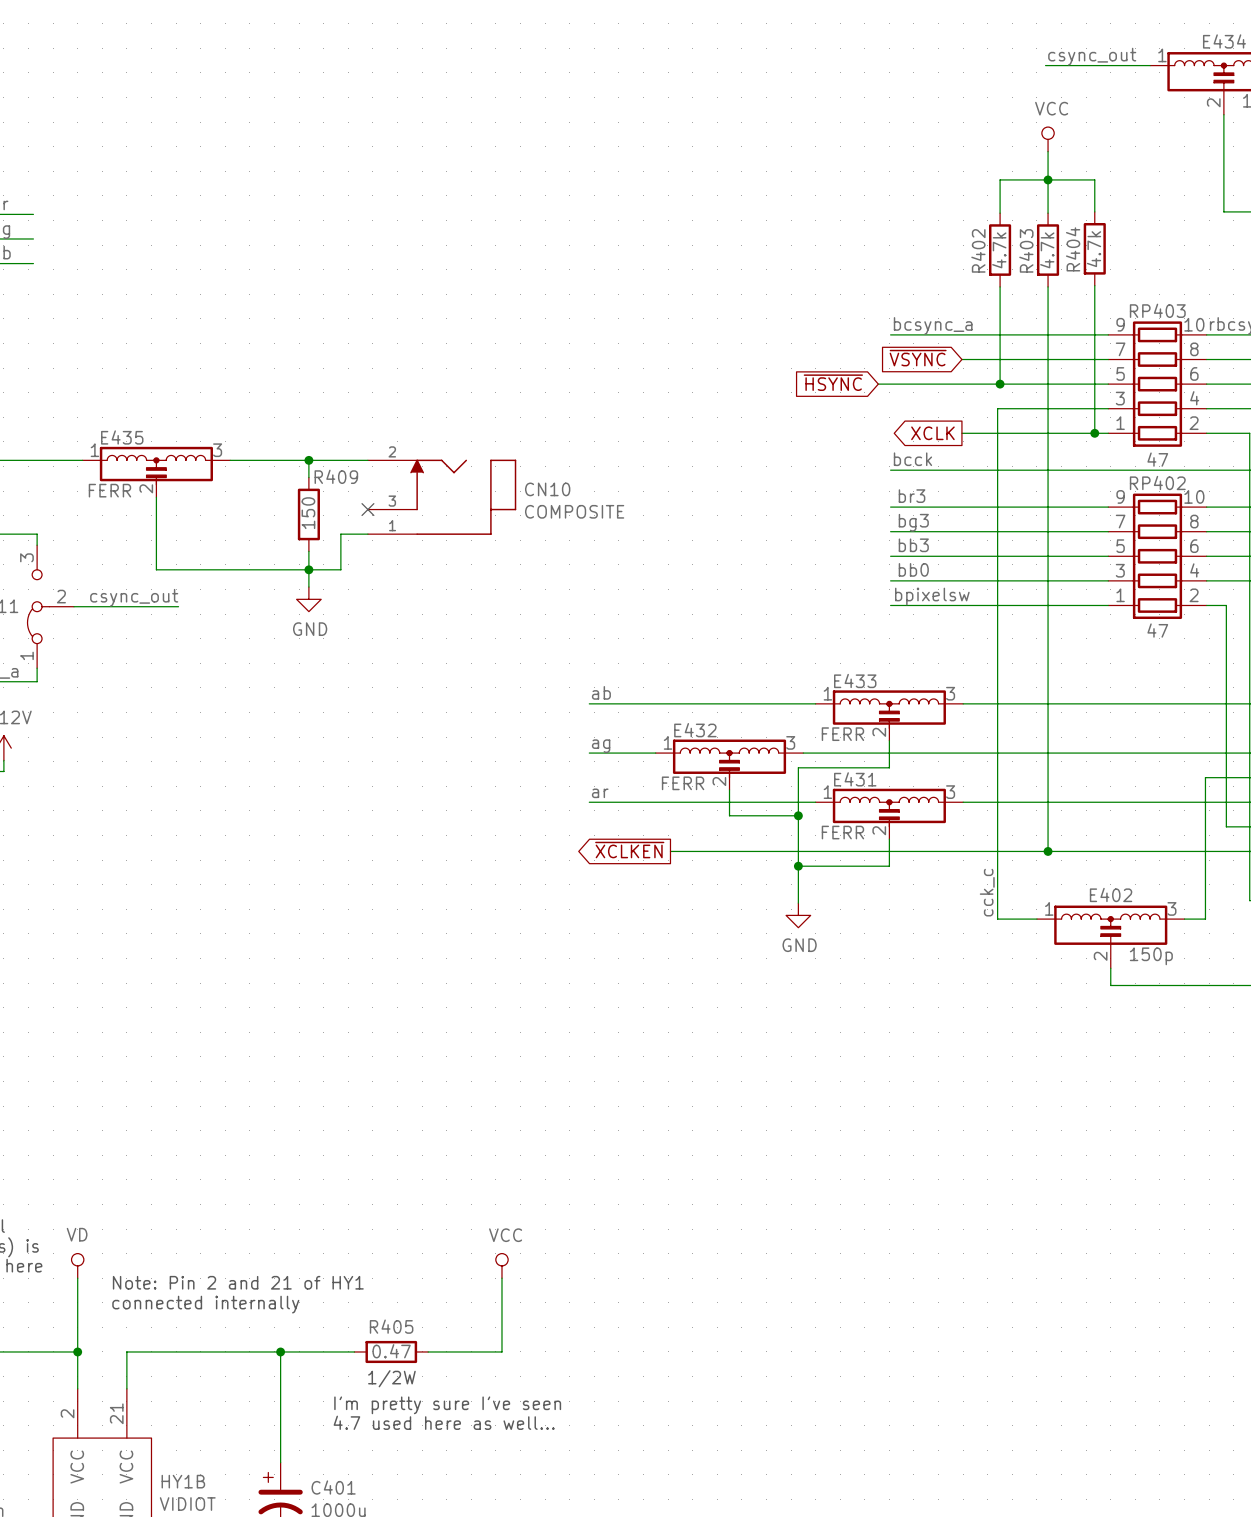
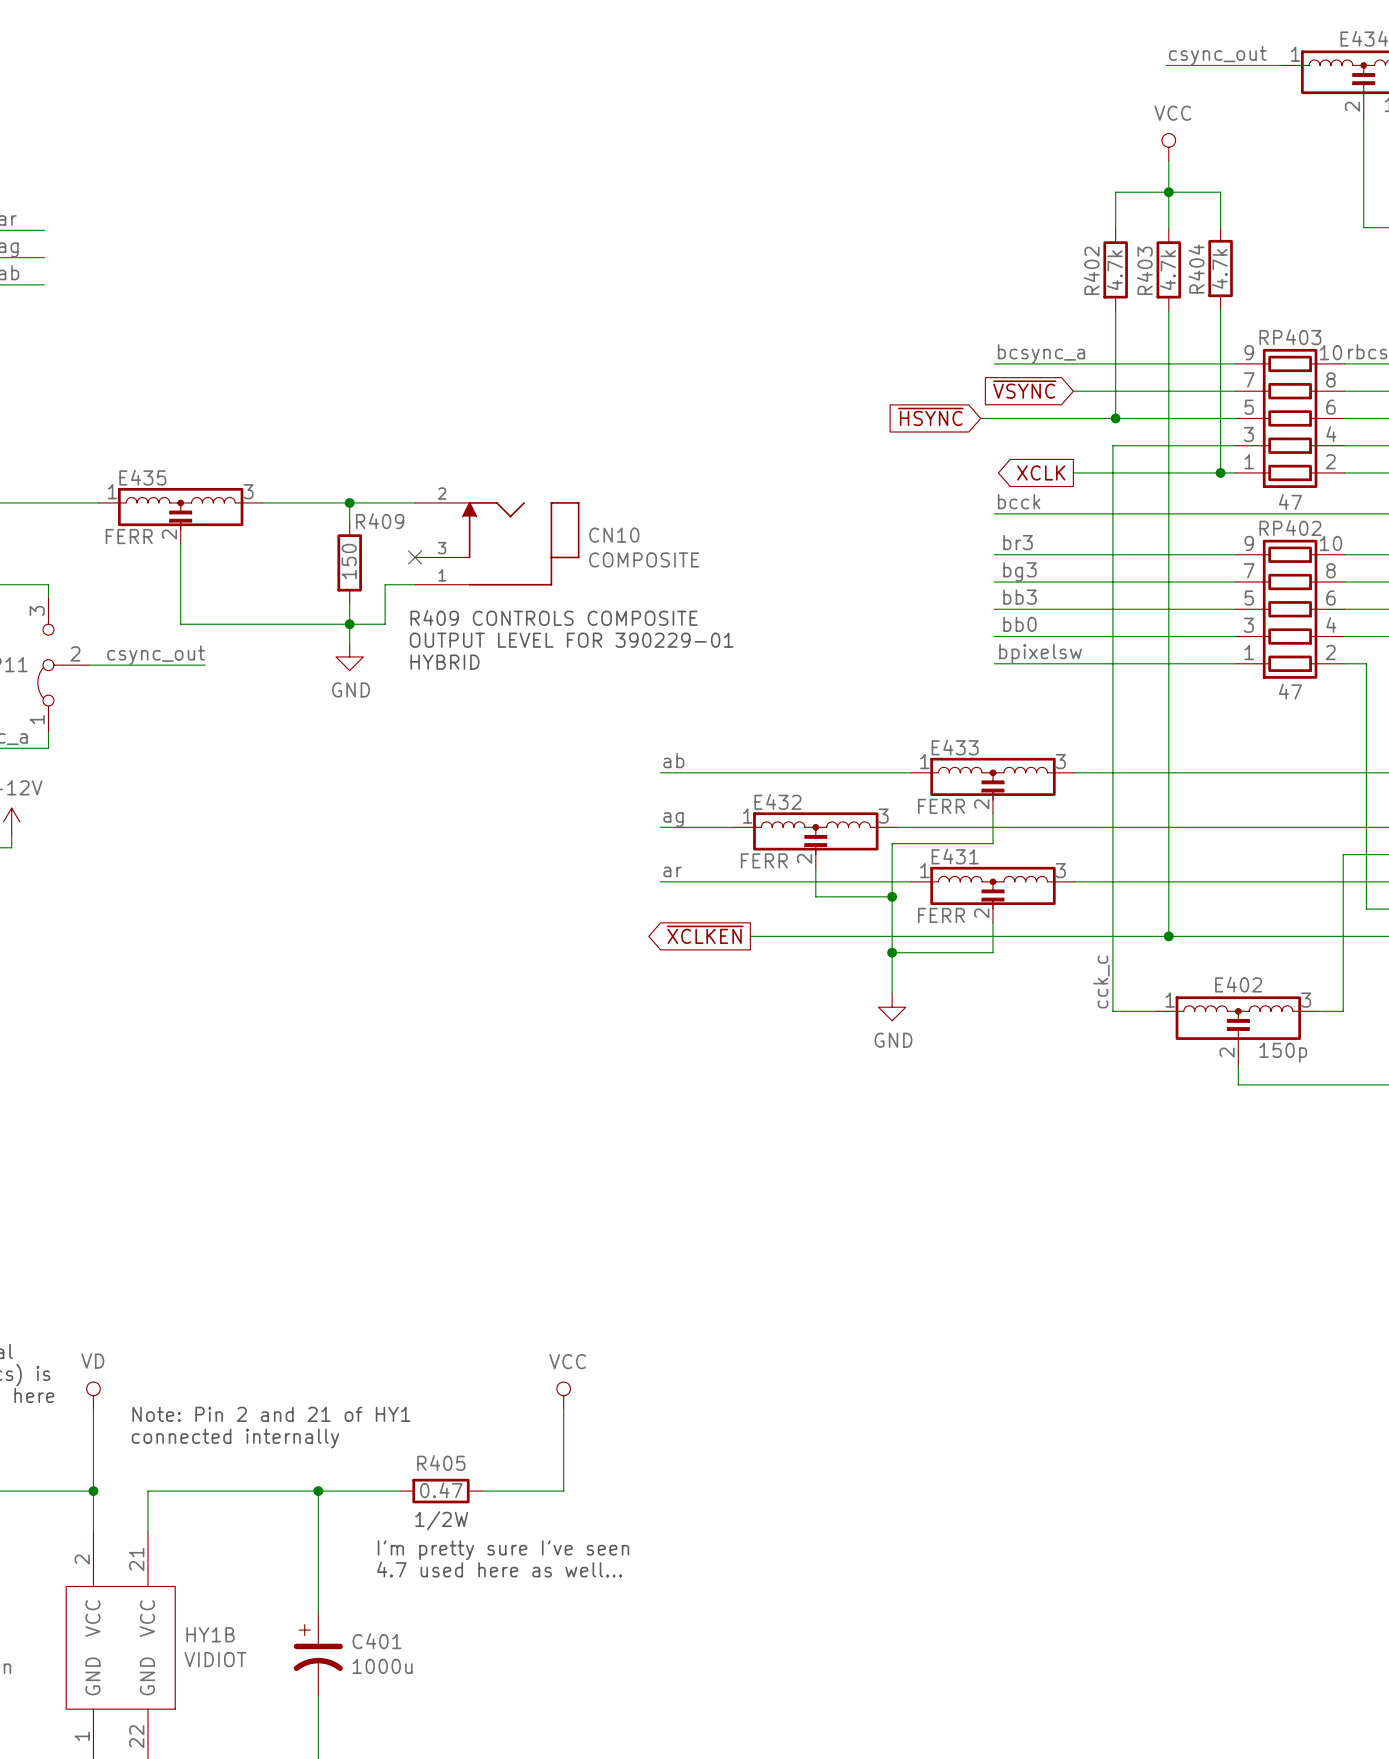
text: none -> R409 CONTROLS COMPOSITE (554, 617)
text: none -> OUTPUT LEVEL FOR 390229-01 (571, 640)
text: none -> HYBRID (445, 662)

